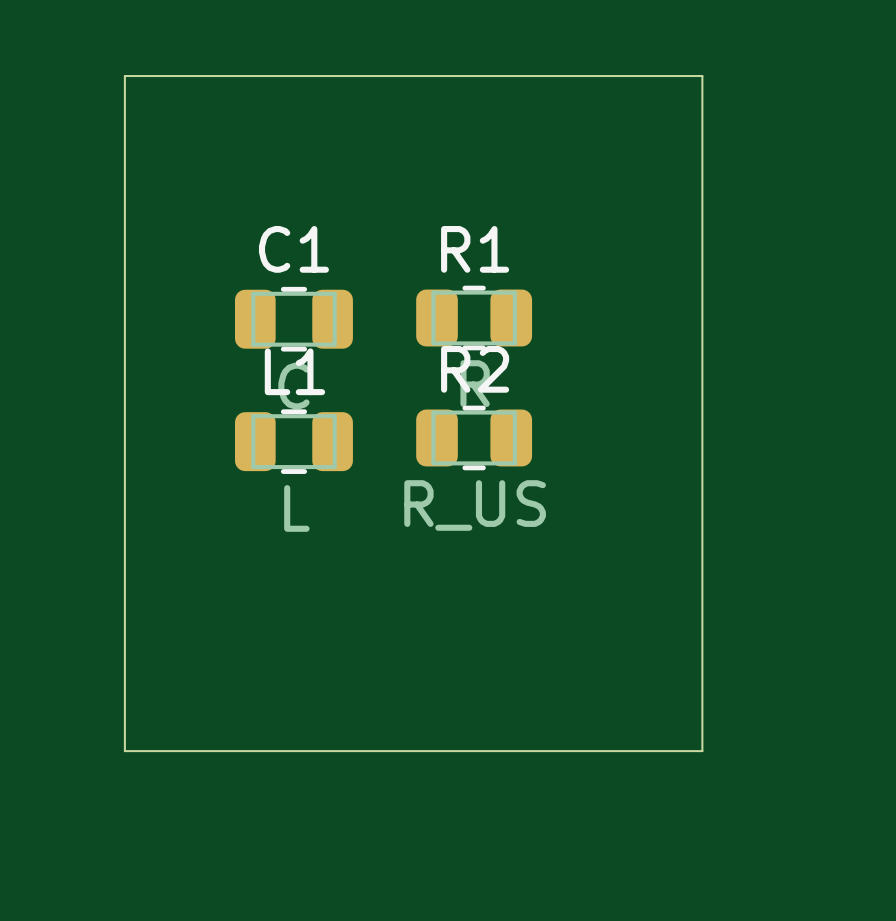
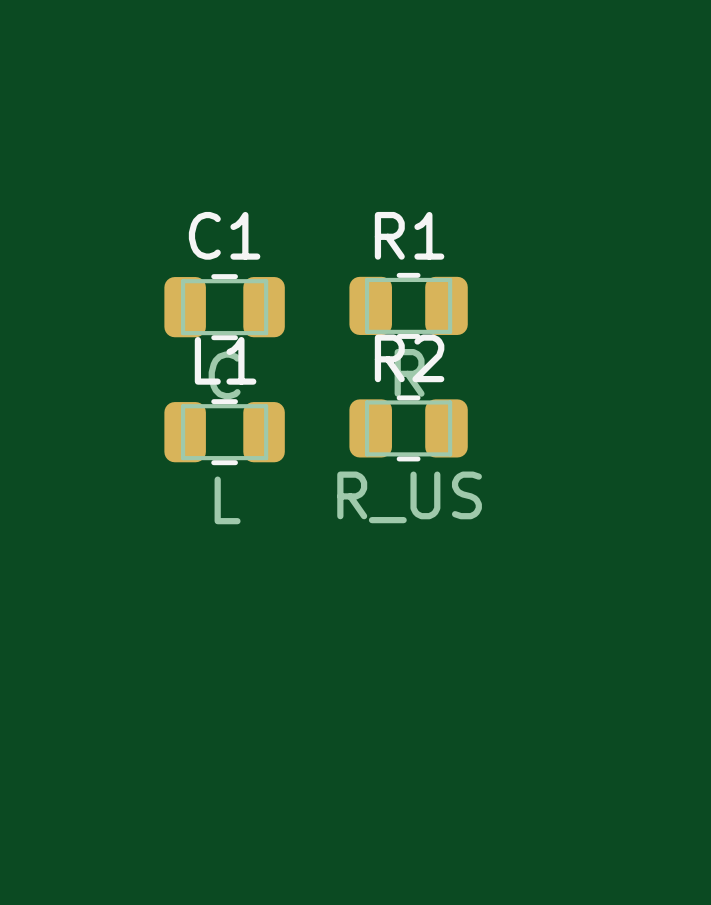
board edge: (124, 76) (702, 76) (702, 751) (124, 751) (124, 76) -> none

